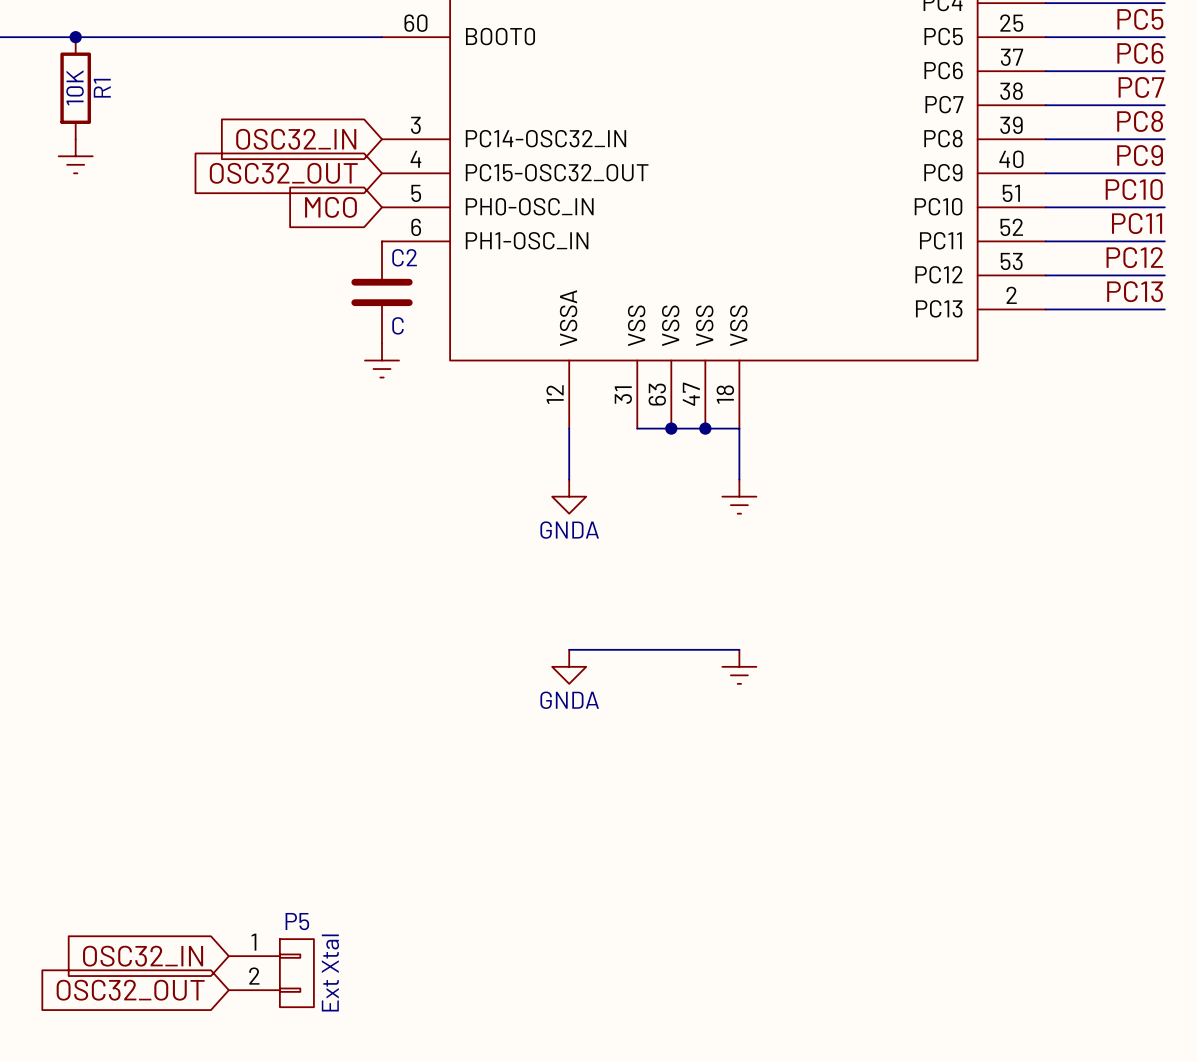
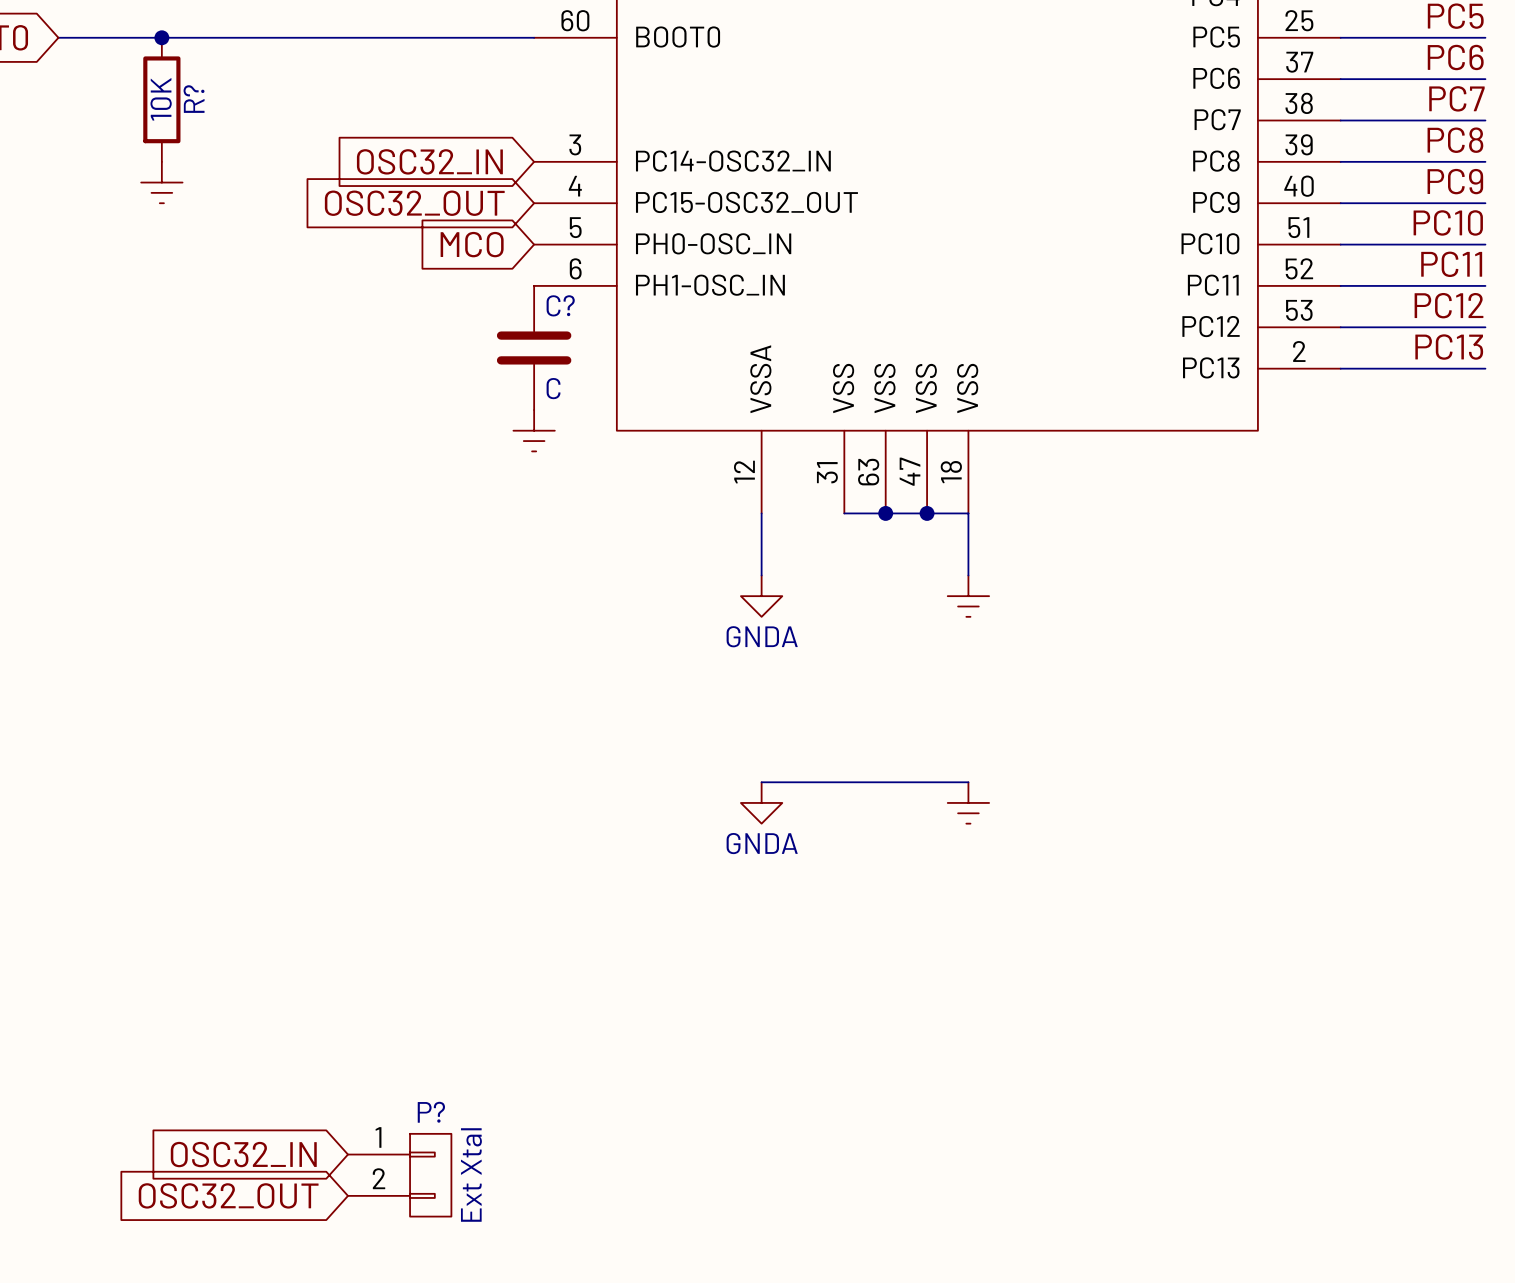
R1 name: R1 (102, 88) -> R? (194, 99)
C2 name: C2 (404, 257) -> C? (560, 305)
P5 name: P5 (297, 921) -> P? (431, 1112)

